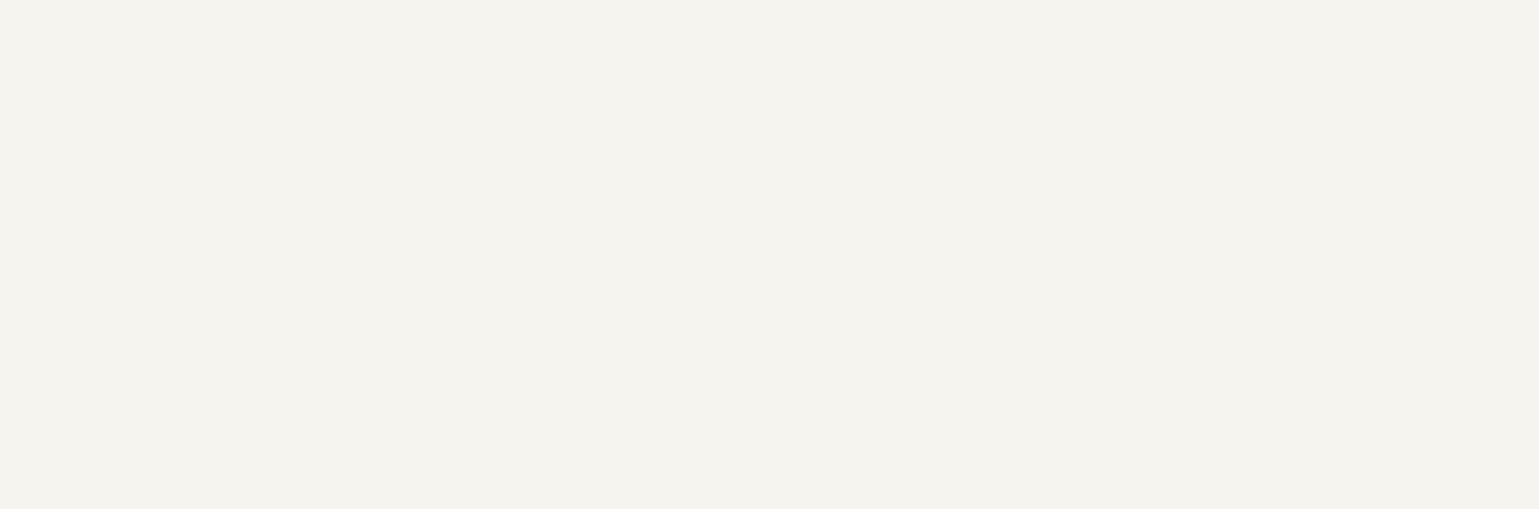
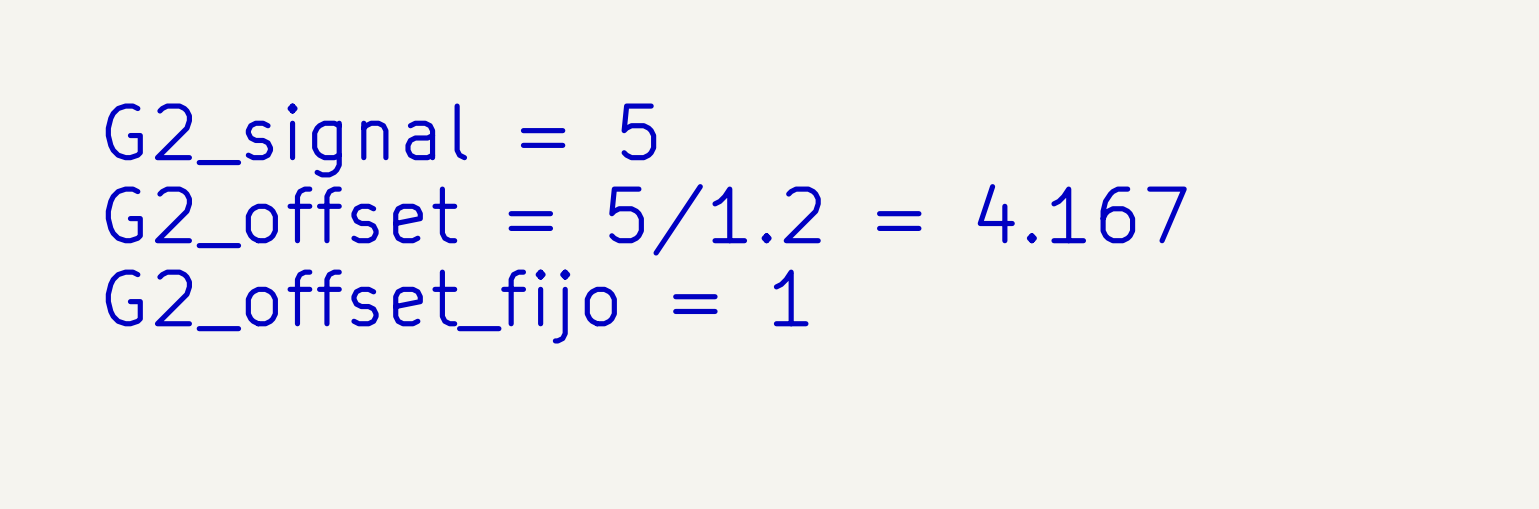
text: none -> G2_signal = 5 (380, 140)
text: none -> G2_offset = 5/1.2 = 4.167 (646, 219)
text: none -> G2_offset_fijo = 1 (457, 306)

